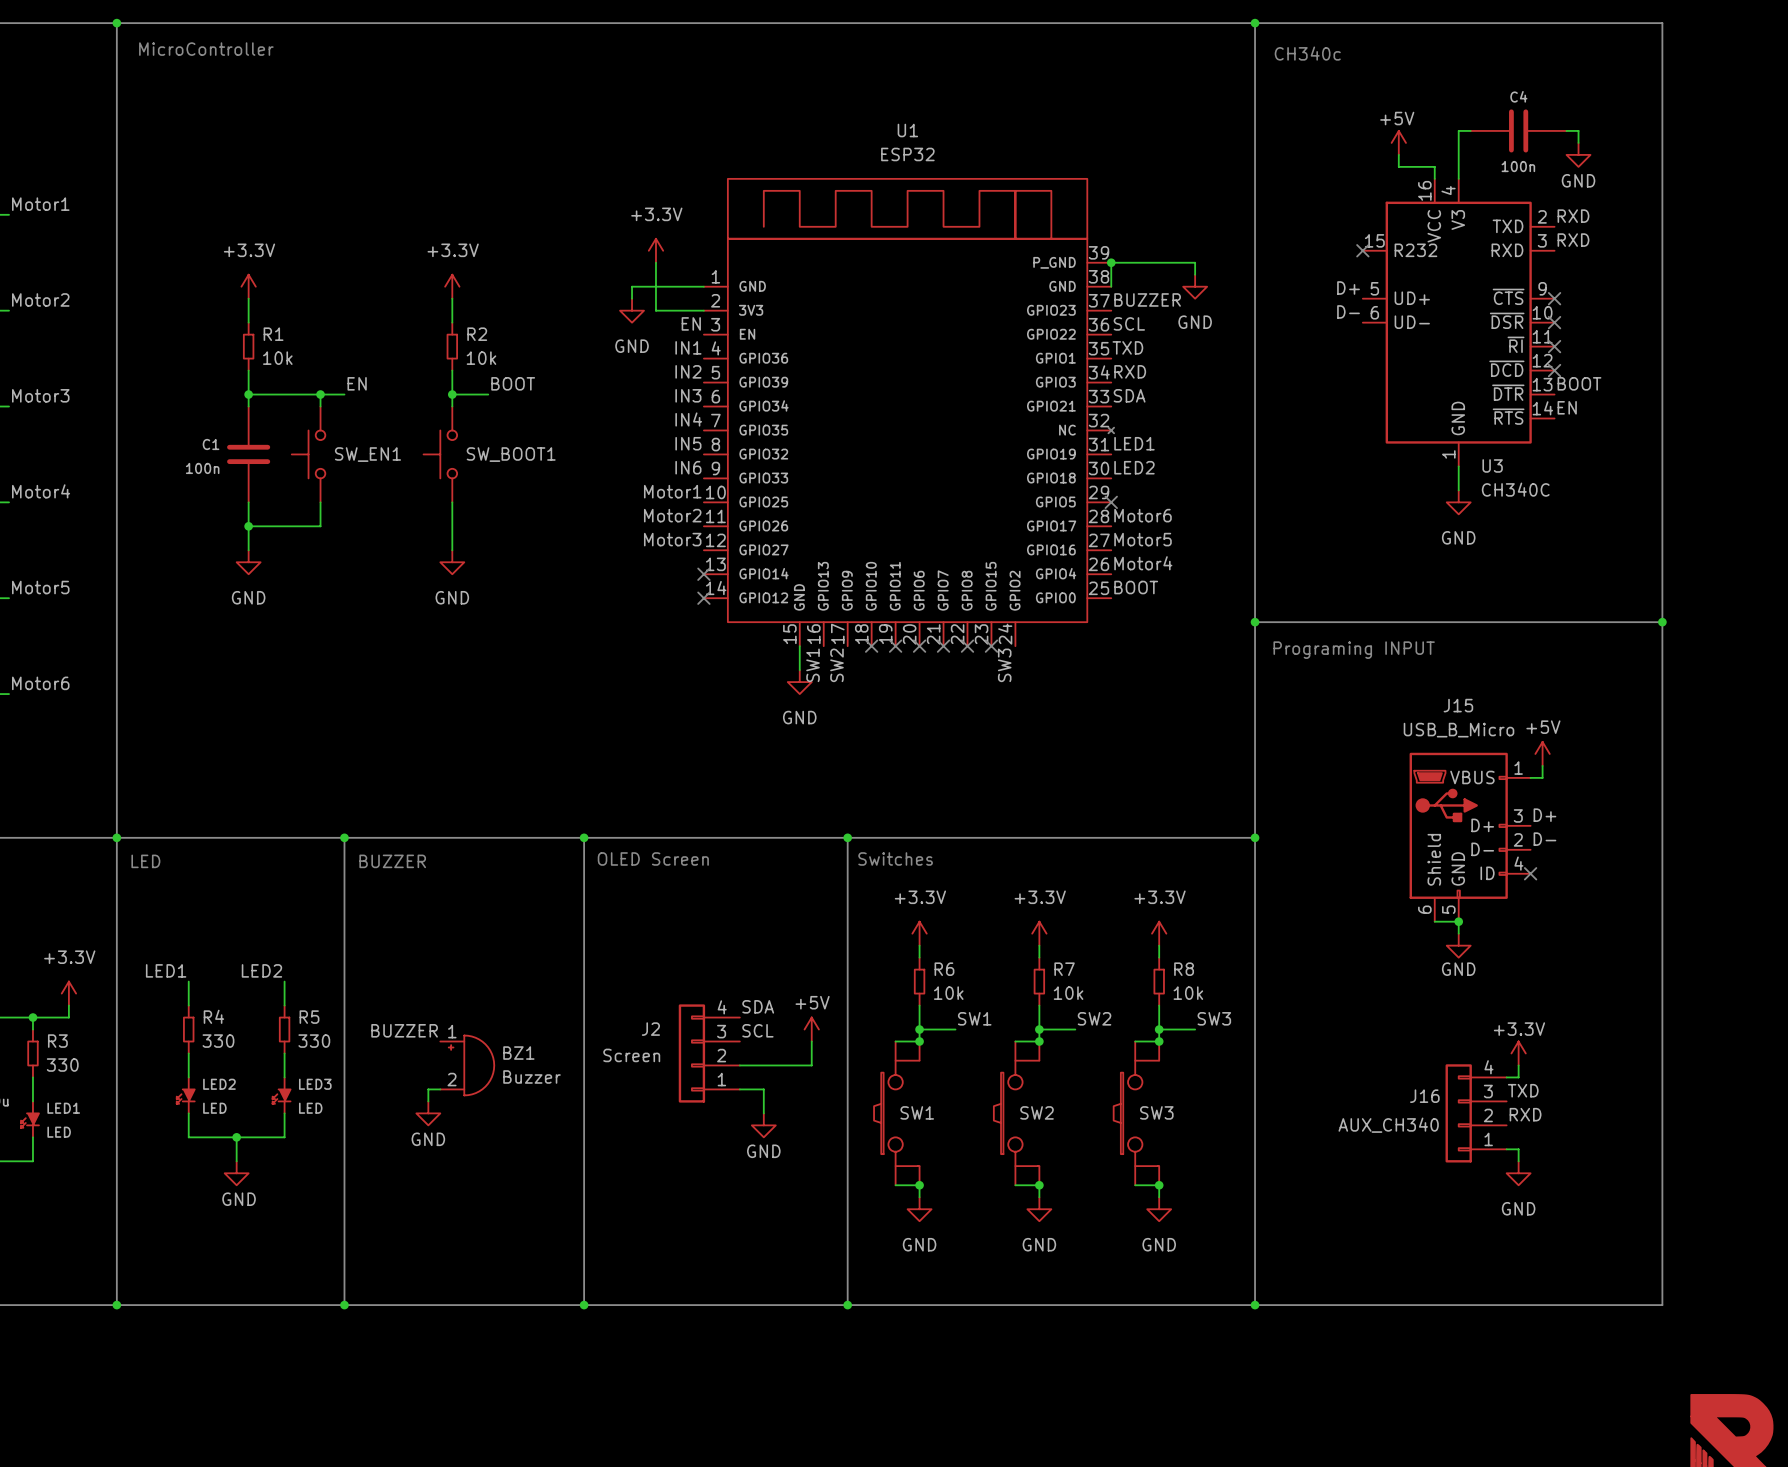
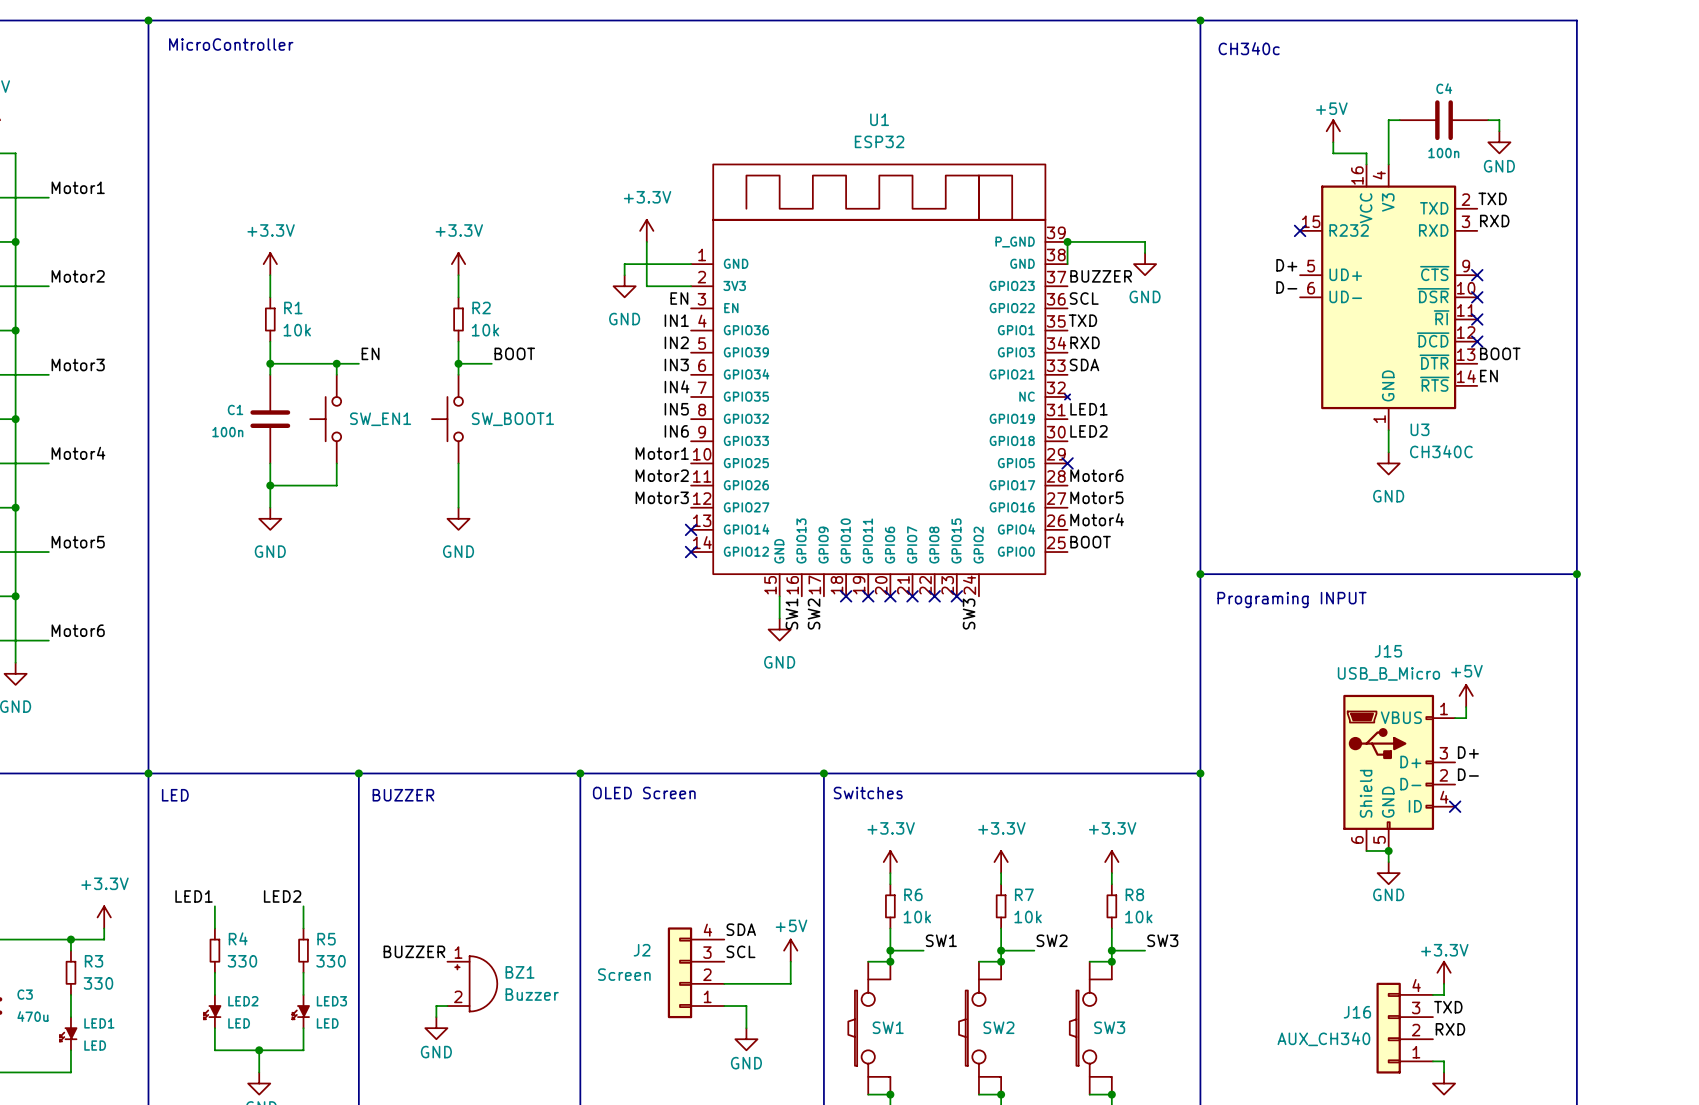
label: RXD (1573, 216) -> TXD (1492, 198)

